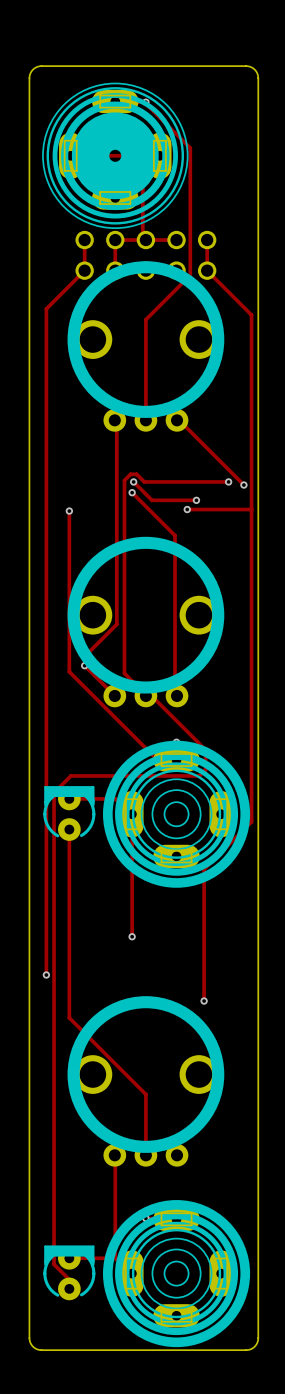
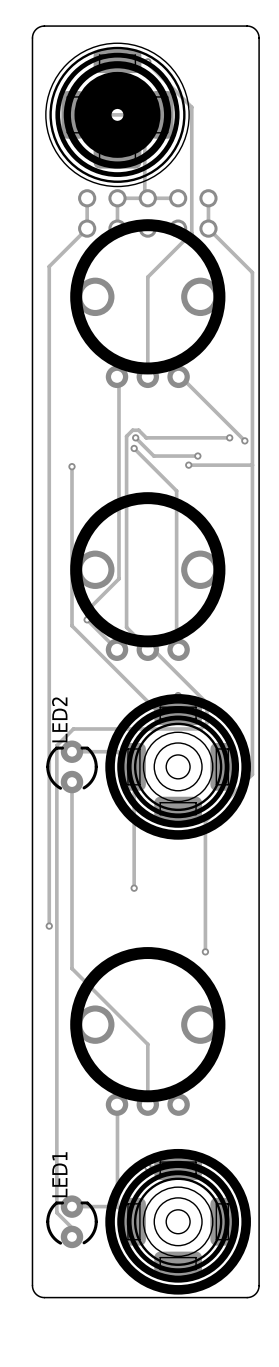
part footprint: [42, 82, 189, 229] -> [45, 42, 190, 188]
part footprint: [102, 740, 251, 888] -> [105, 694, 251, 840]
part: (69, 813) -> none
LED2: none -> (71, 766)
part footprint: [102, 1200, 251, 1348] -> [105, 1148, 251, 1295]
part: (69, 1272) -> none
LED1: none -> (71, 1221)

